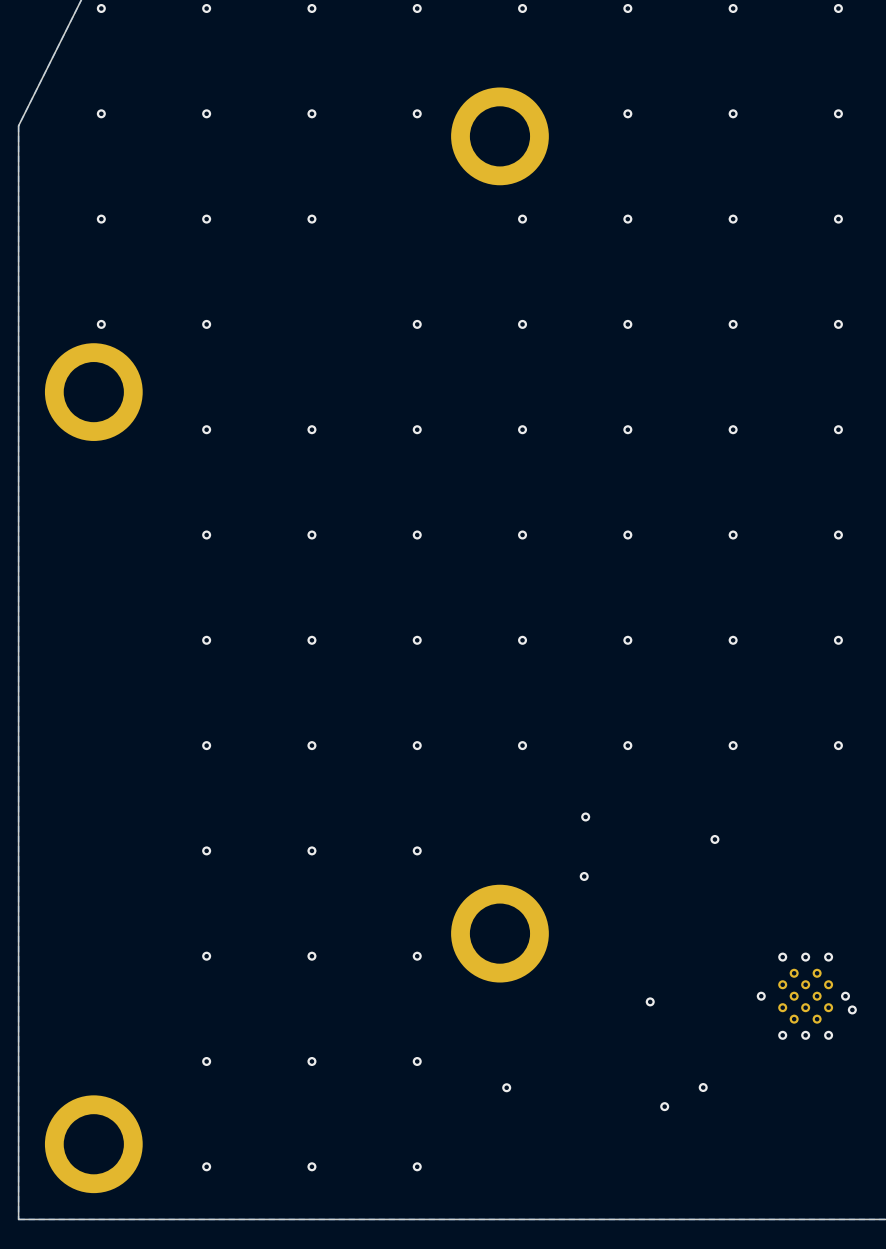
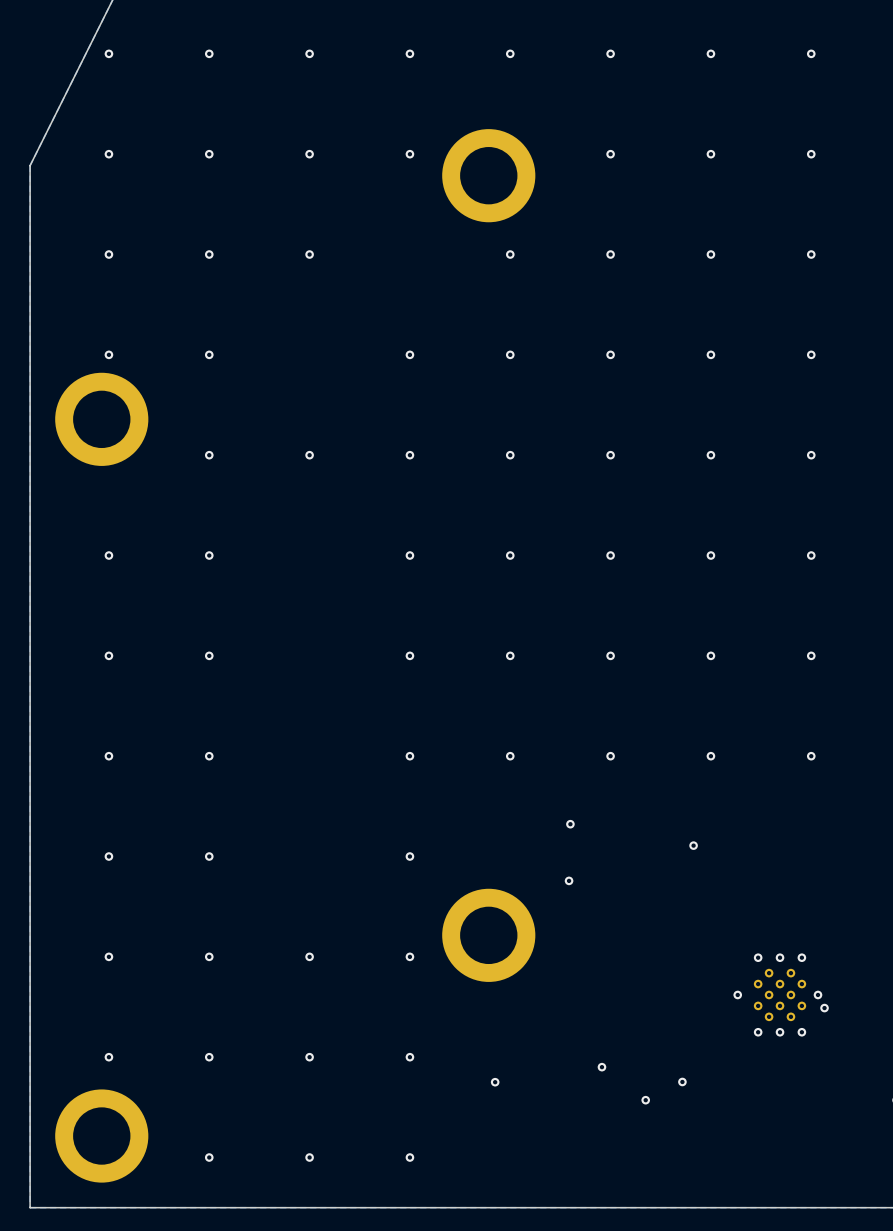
via: none -> (108, 555)
via: (311, 535) -> none
via: none -> (108, 655)
via: (311, 640) -> none
via: none -> (108, 756)
via: (311, 745) -> none
via: none -> (108, 856)
via: (311, 850) -> none
via: none -> (108, 956)
via position: (650, 1001) -> (601, 1067)
via: none -> (108, 1057)

